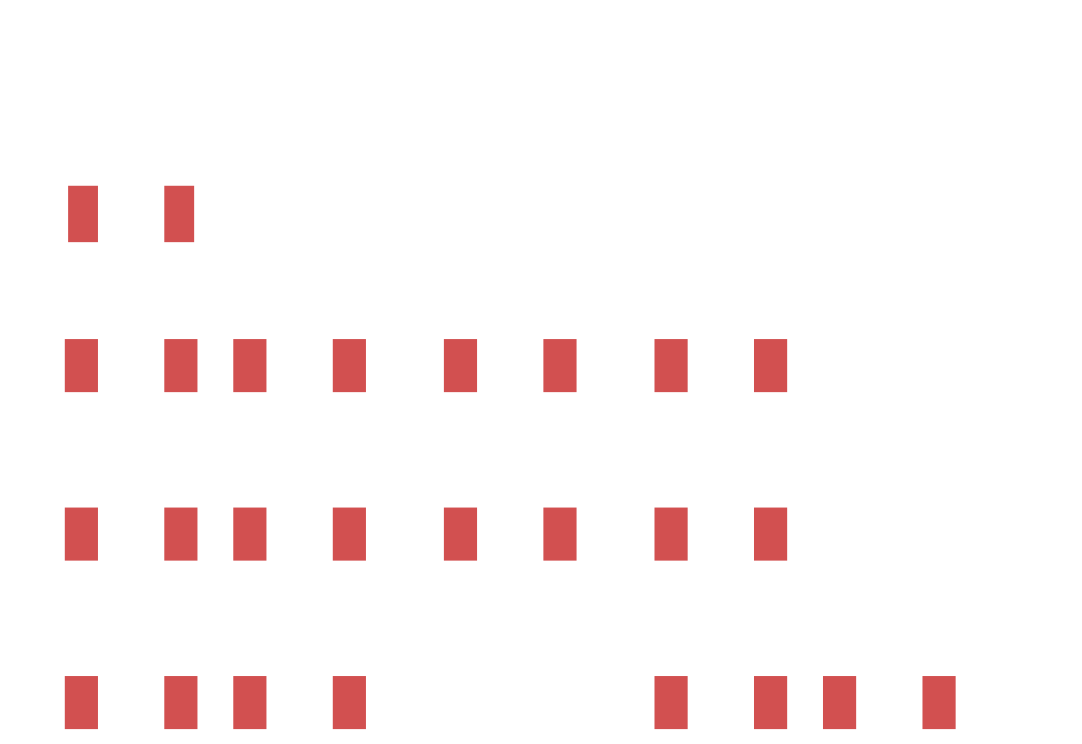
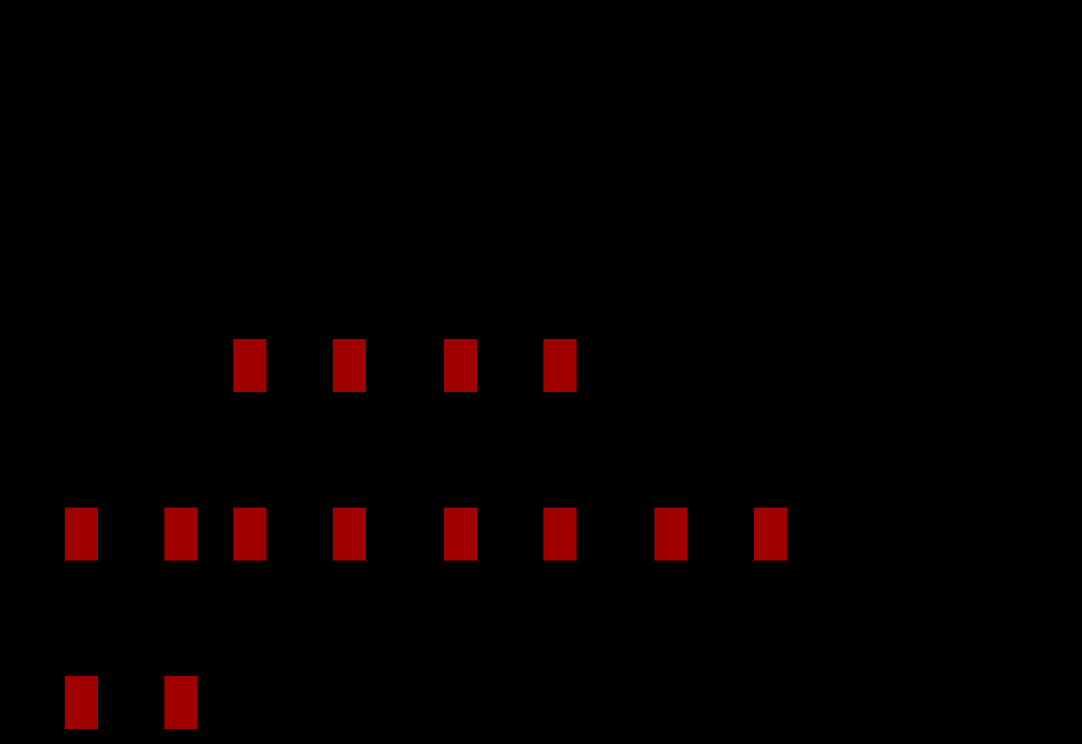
part: (131, 213) -> none
part: (131, 365) -> none
part: (720, 365) -> none
part: (299, 702) -> none
part: (720, 702) -> none
part: (889, 702) -> none

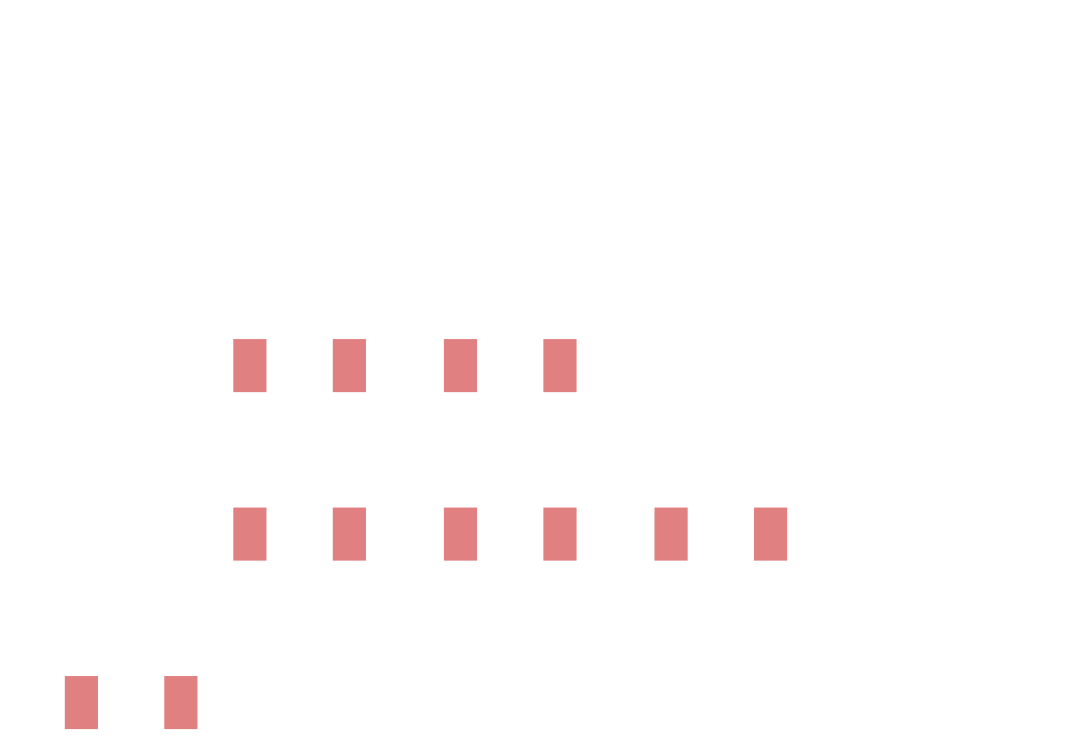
part: (131, 534) -> none

